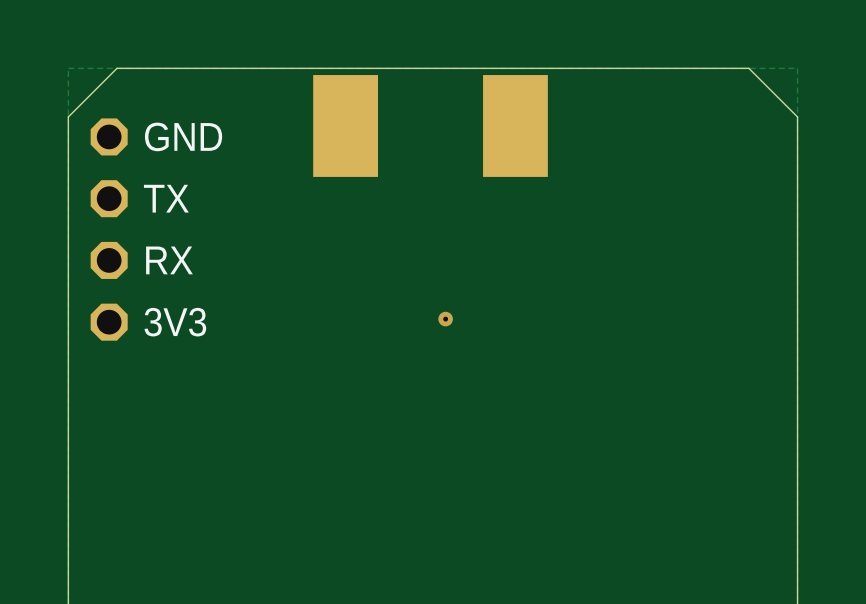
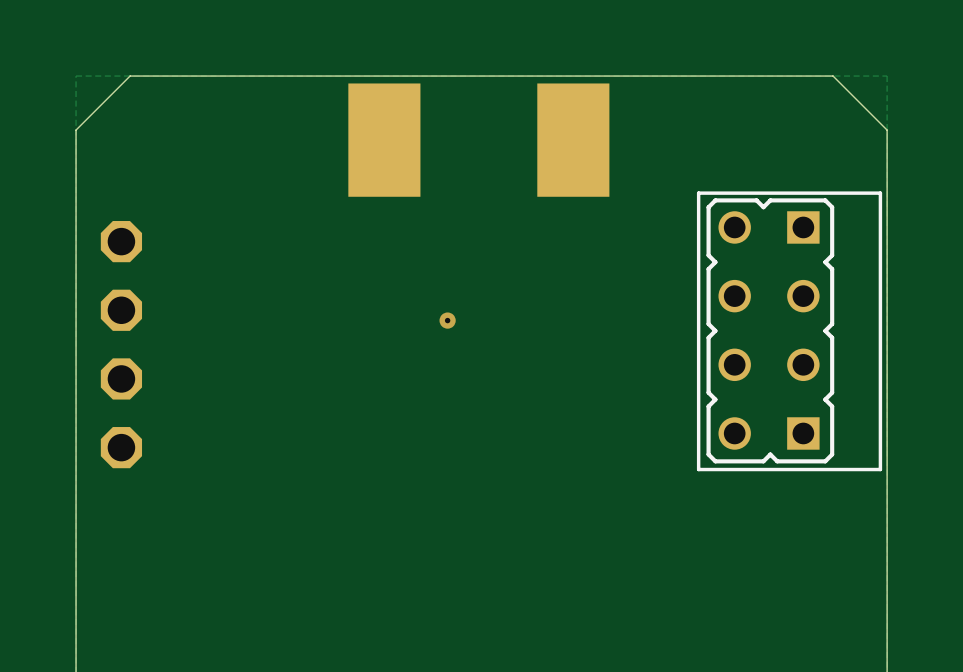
text: GND (183, 136) -> none
text: TX (166, 198) -> none
part position: (109, 229) -> (121, 344)
text: RX (169, 260) -> none
part: none -> (789, 331)
via position: (445, 319) -> (447, 320)
text: 3V3 (175, 322) -> none

